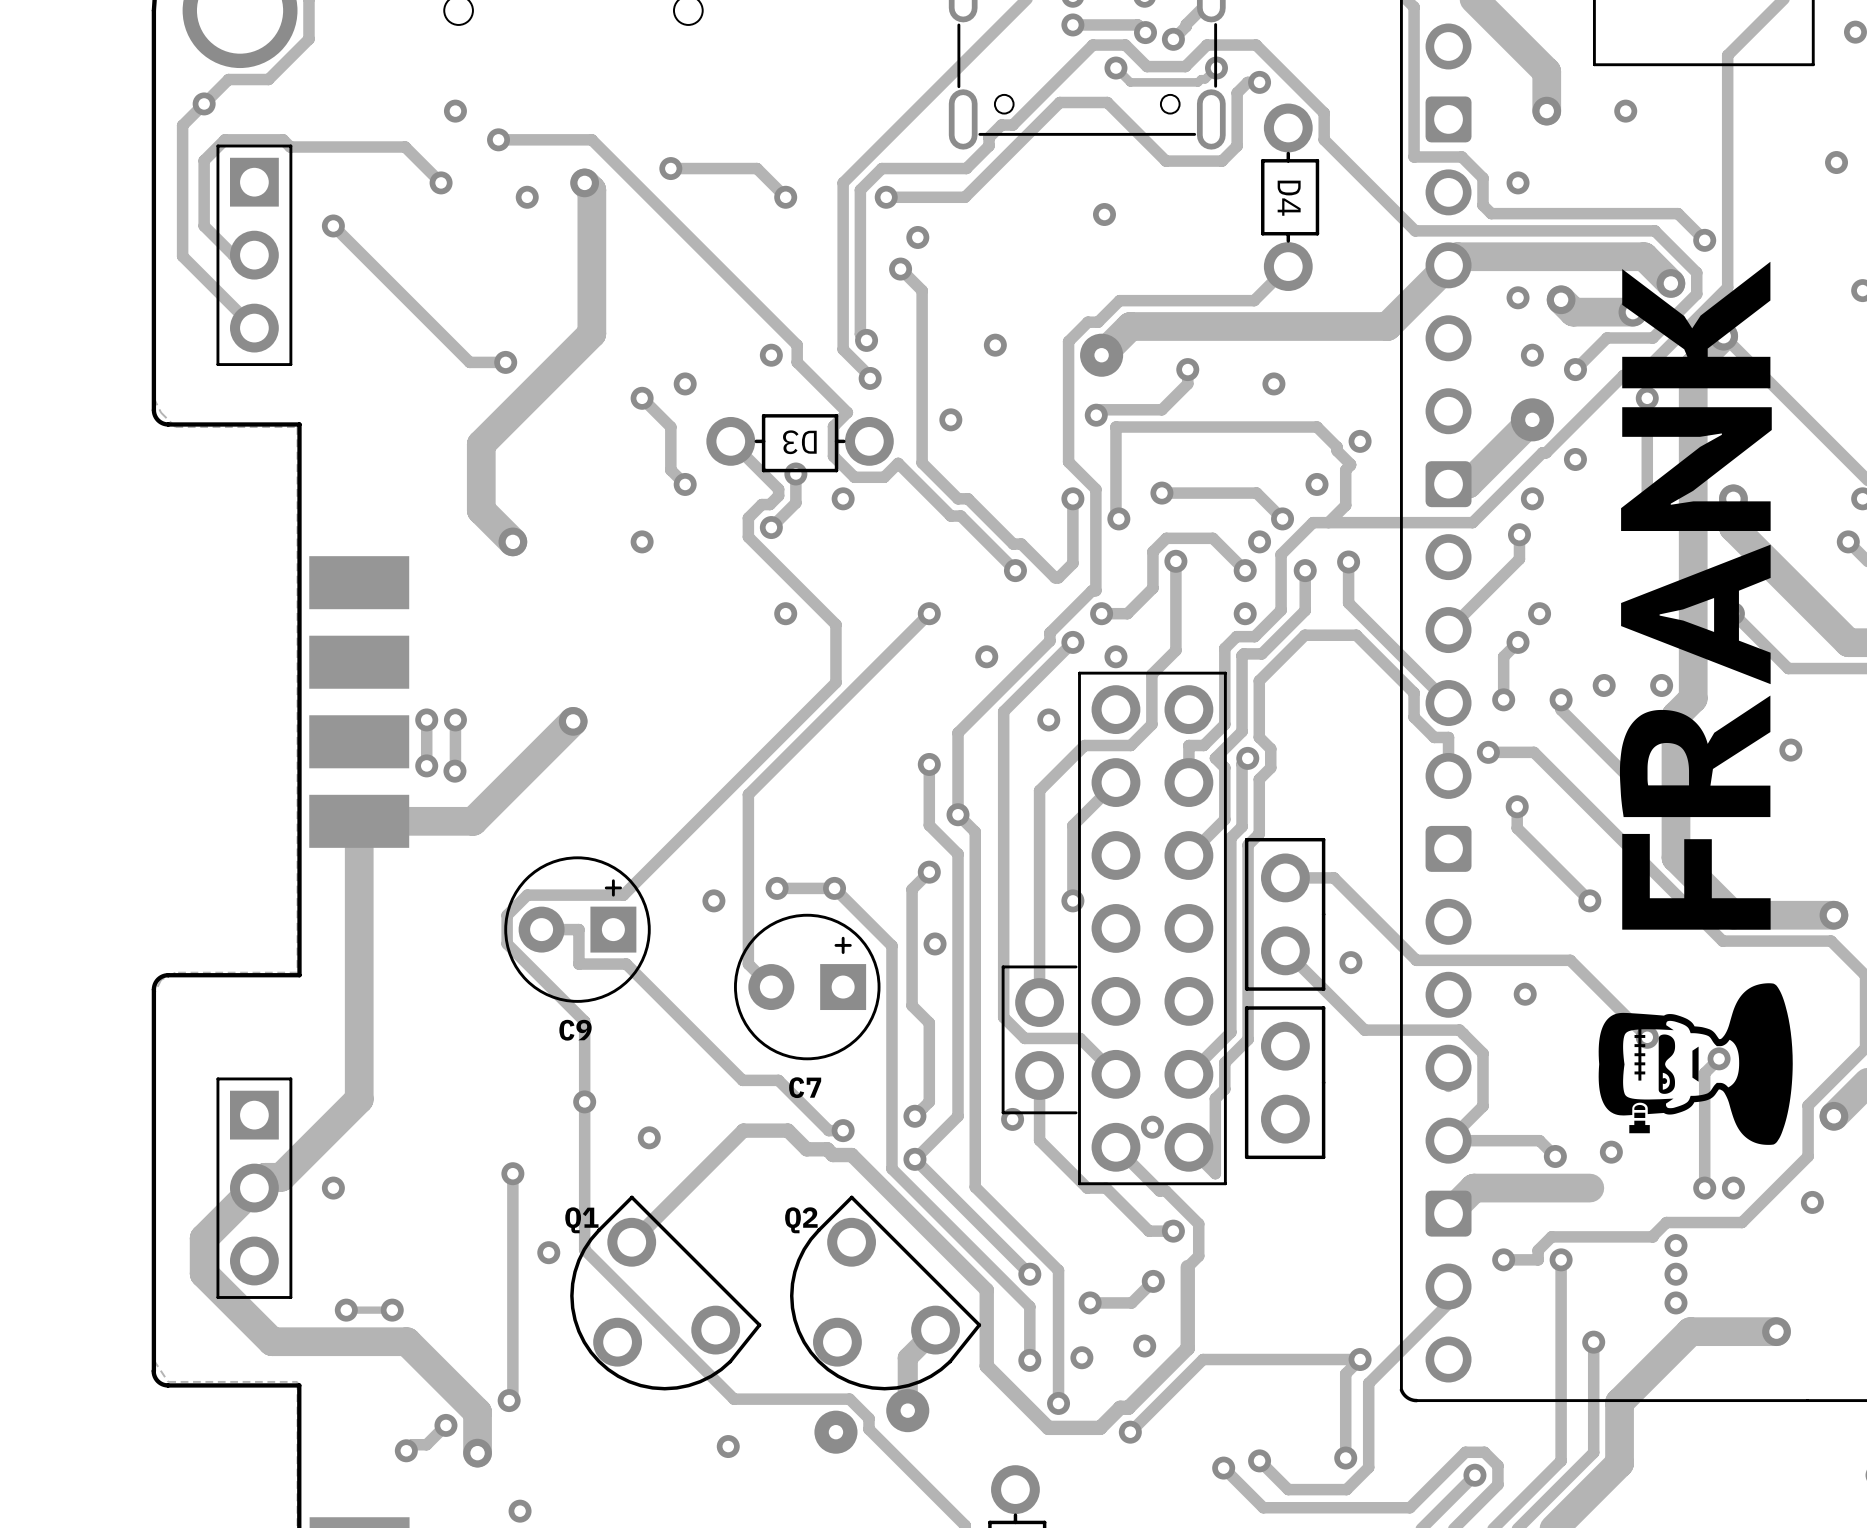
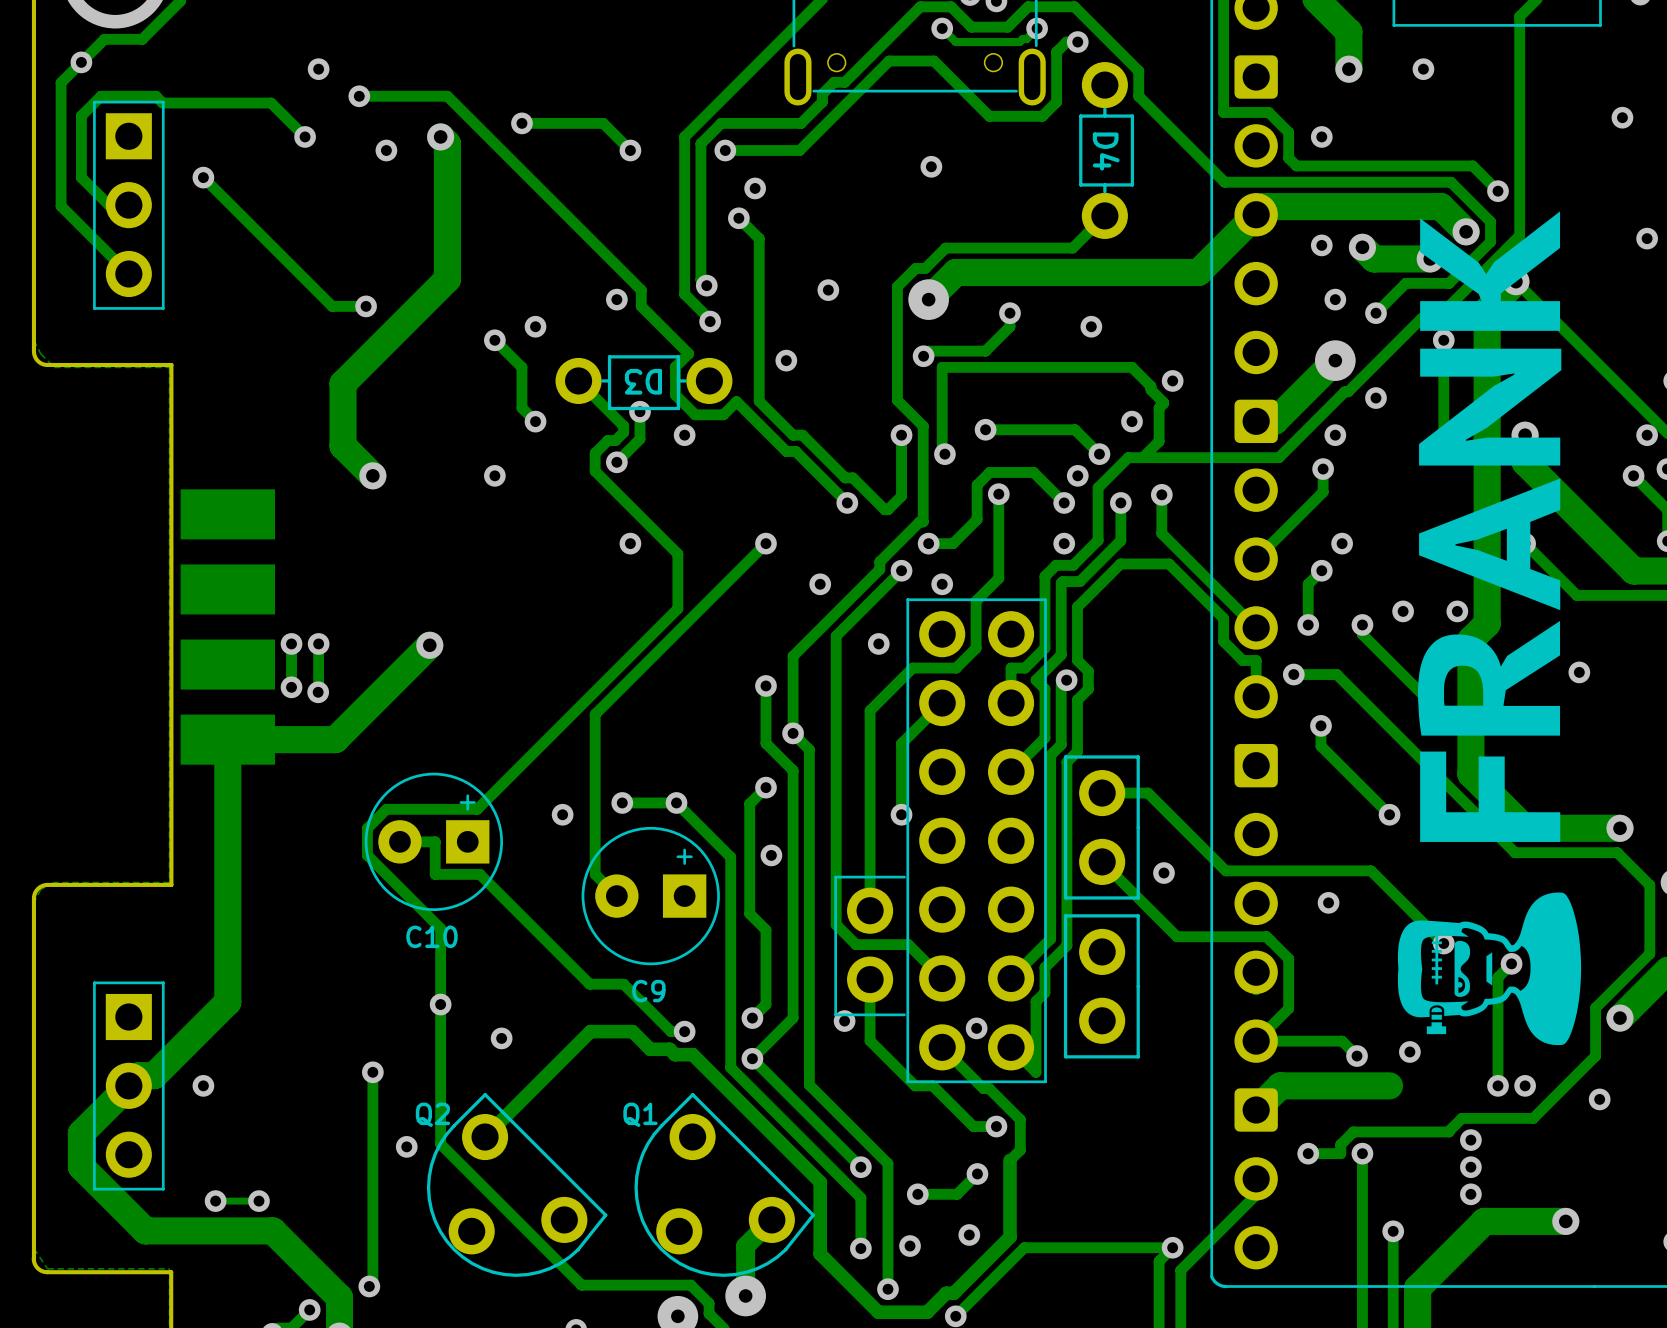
C9 name: C9 (575, 1030) -> C10 (431, 936)
C7 name: C7 (805, 1087) -> C9 (648, 991)
Q1 name: Q1 (581, 1220) -> Q2 (432, 1114)
Q2 name: Q2 (801, 1220) -> Q1 (640, 1114)

